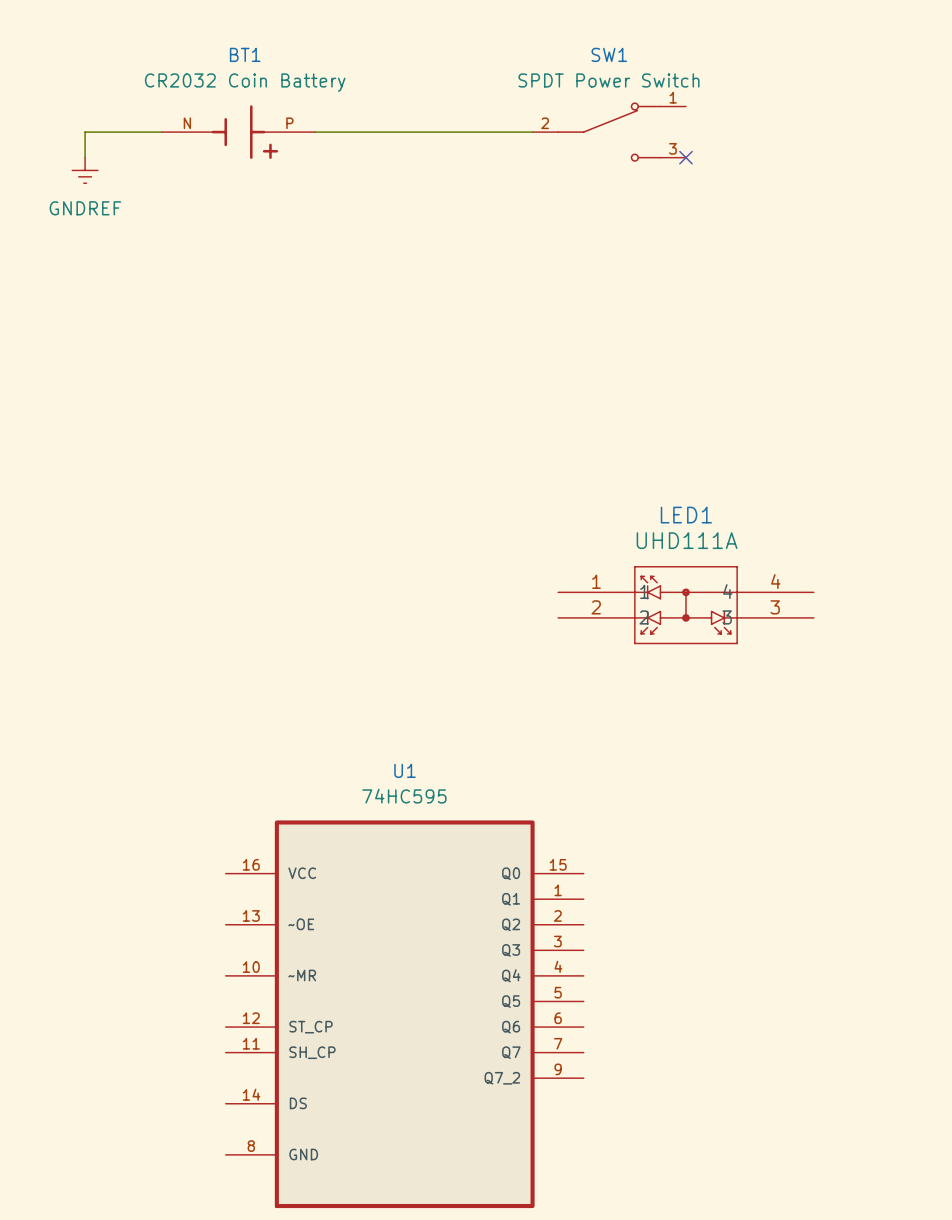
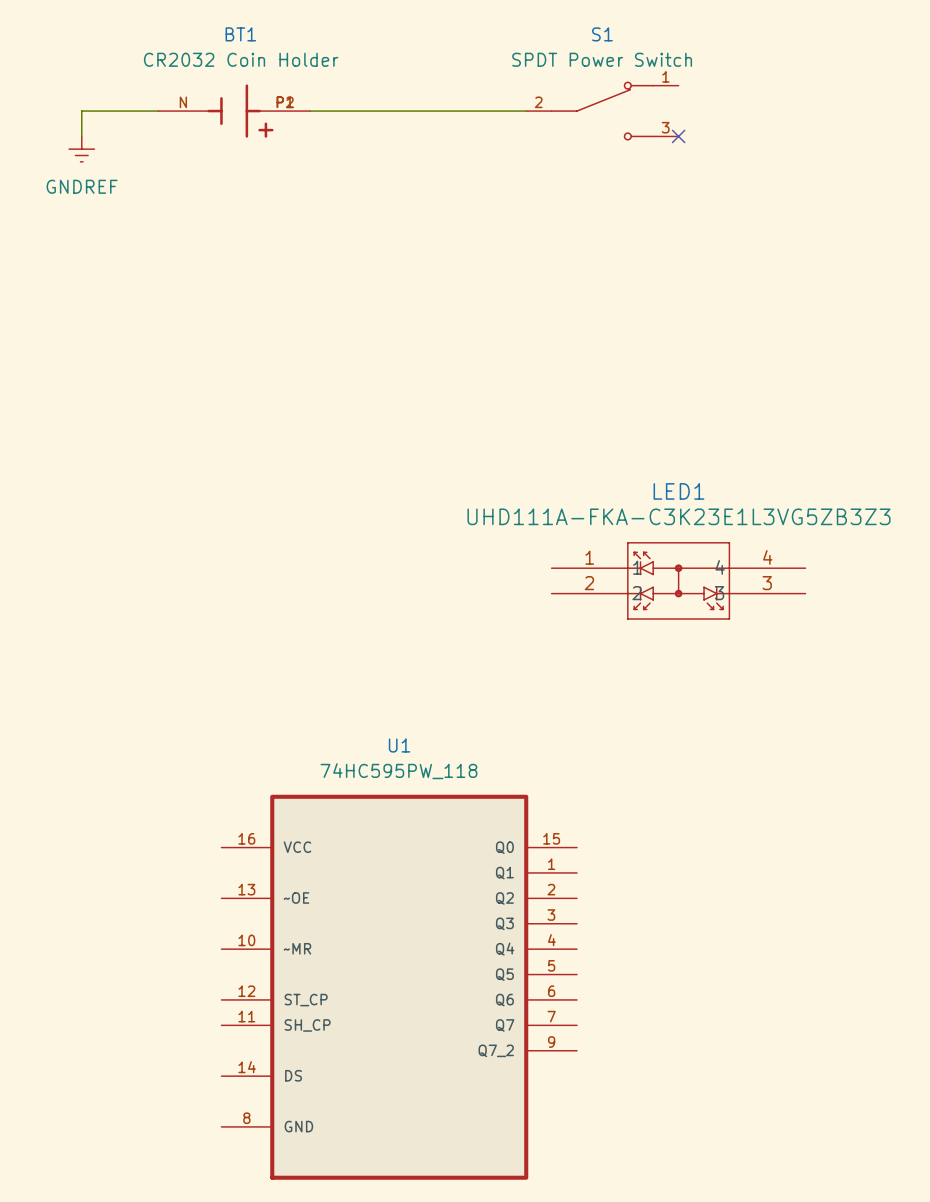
SW1 name: SW1 (609, 54) -> S1 (602, 34)
BT1 value: CR2032 Coin Battery (245, 82) -> CR2032 Coin Holder (241, 59)
BT1 symbol: [161, 105, 316, 159] -> [157, 84, 311, 138]
LED1 value: UHD111A (687, 540) -> UHD111A-FKA-C3K23E1L3VG5ZB3Z3 (678, 516)
U1 value: 74HC595 (404, 796) -> 74HC595PW_118 (398, 771)

